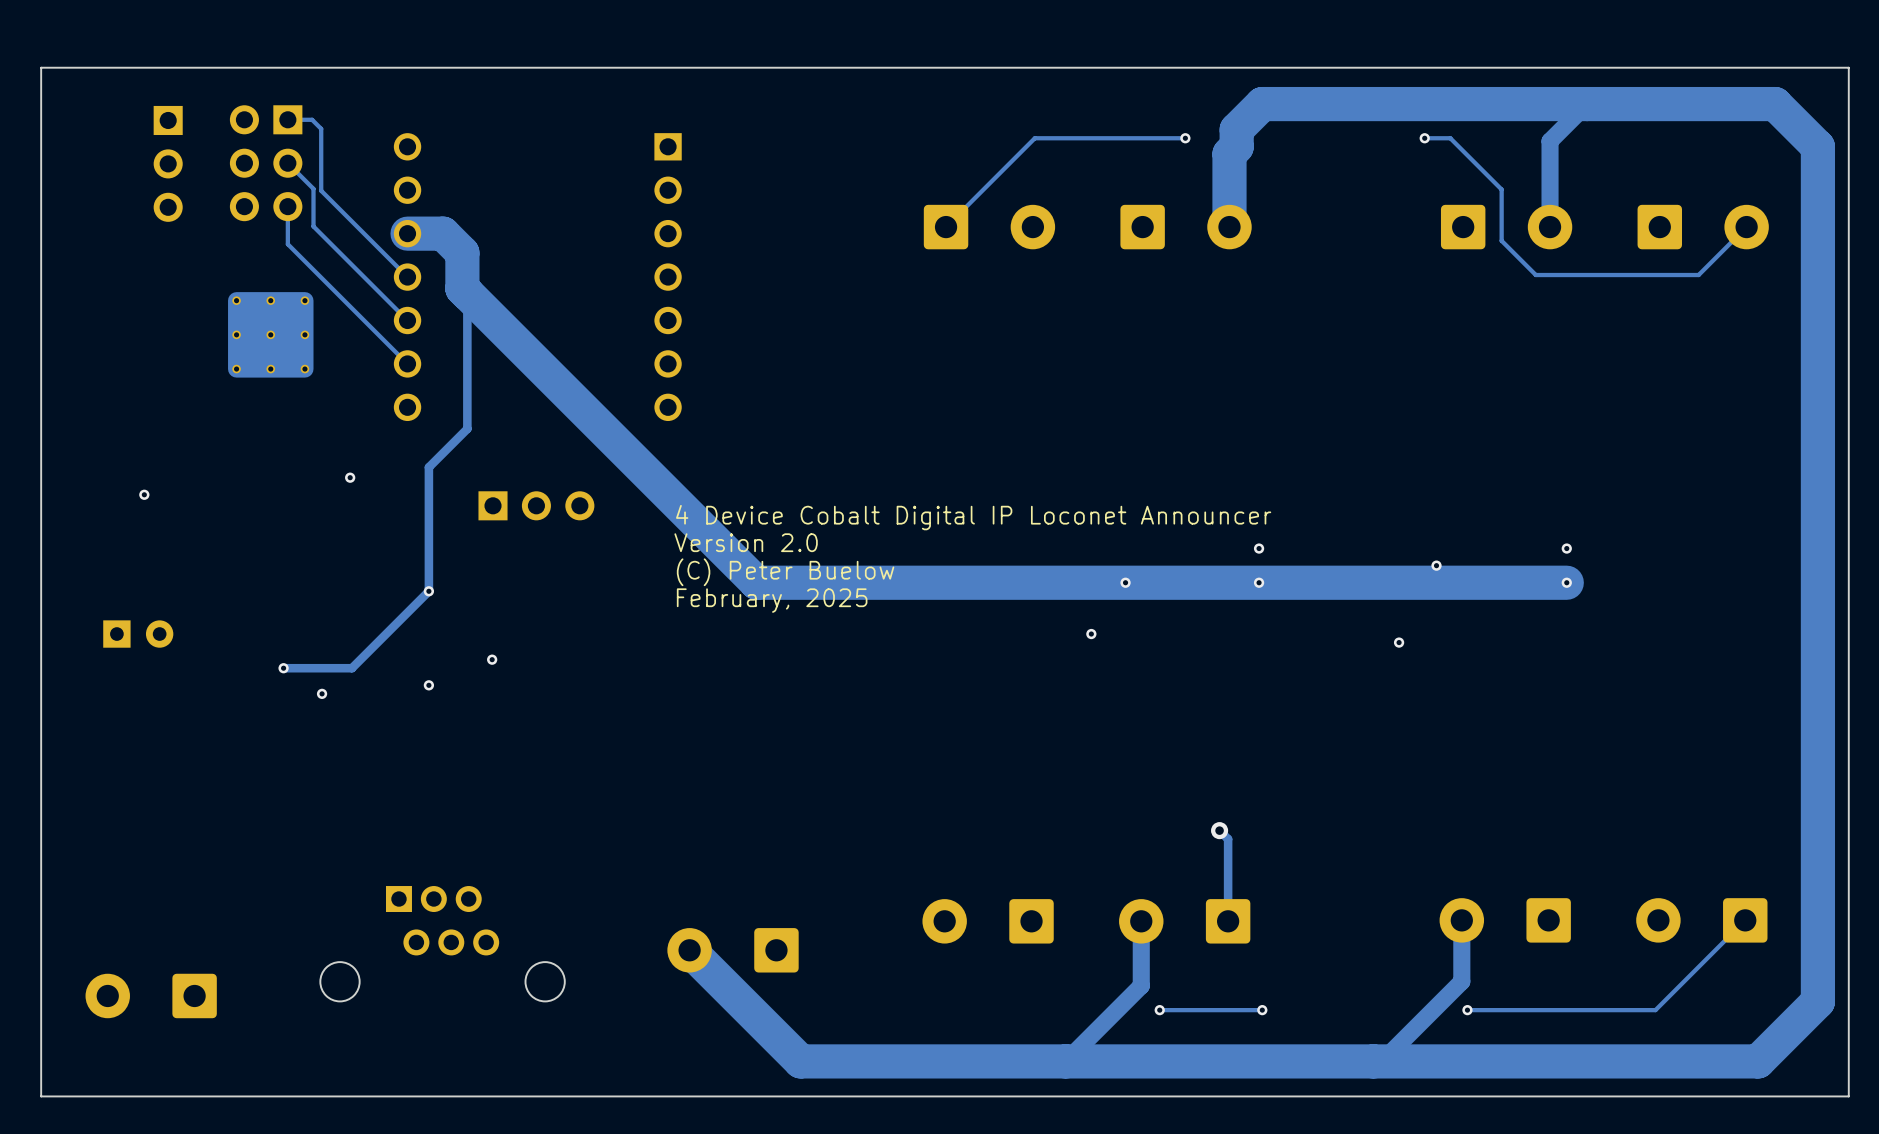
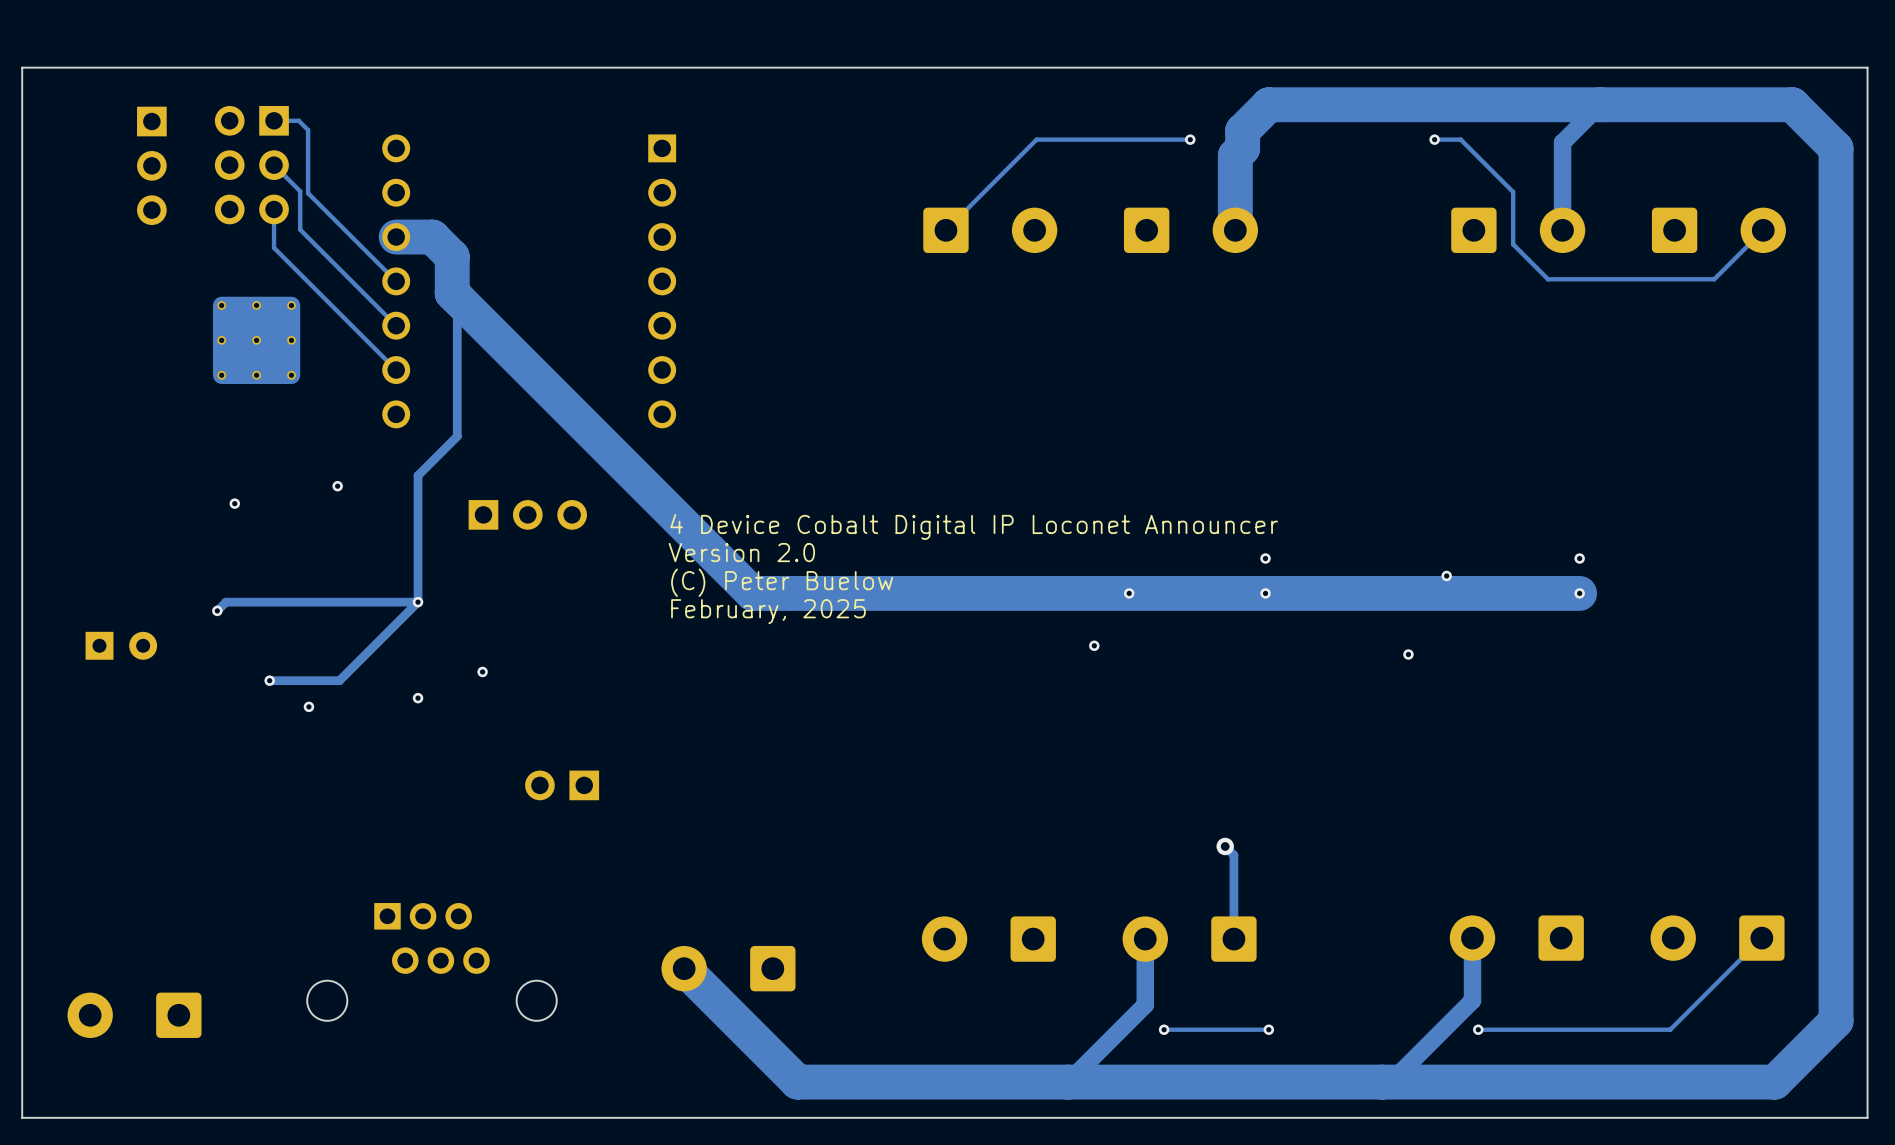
via: (144, 494) -> none
via: none -> (234, 503)
track: none -> (418, 602) (226, 602) (217, 610)
via: none -> (217, 610)
part: none -> (562, 785)

